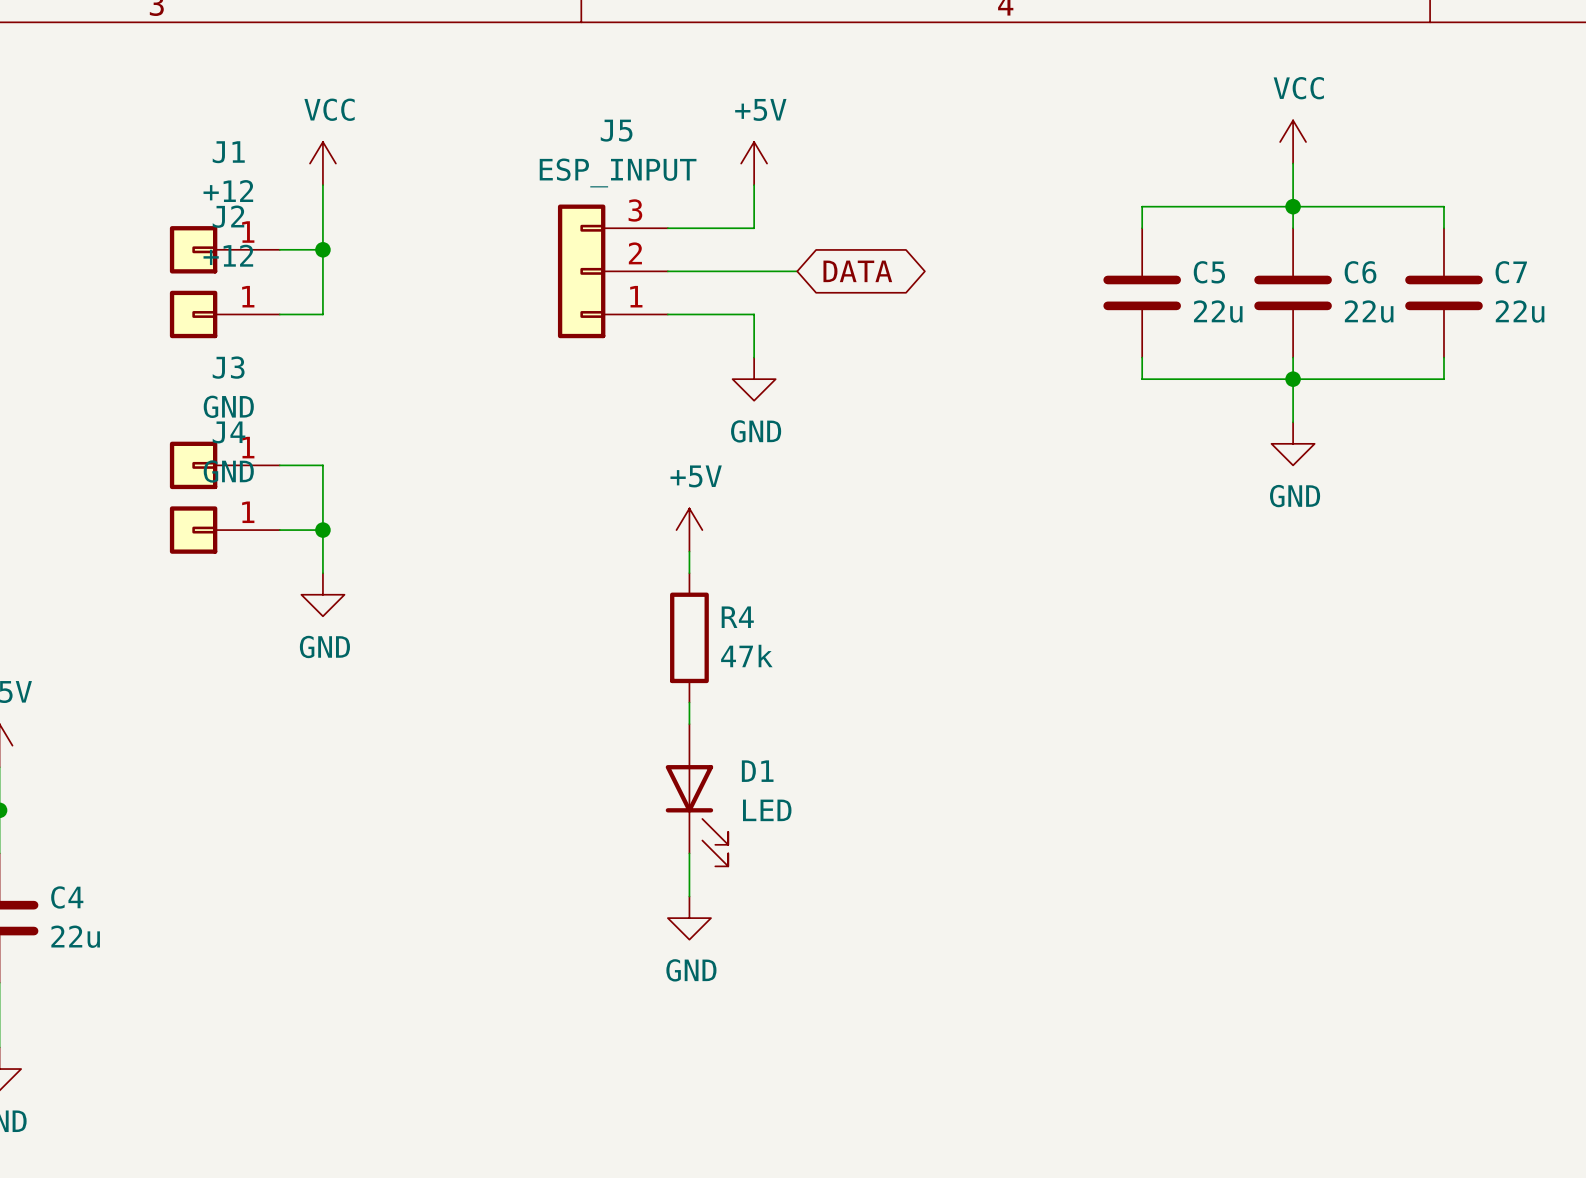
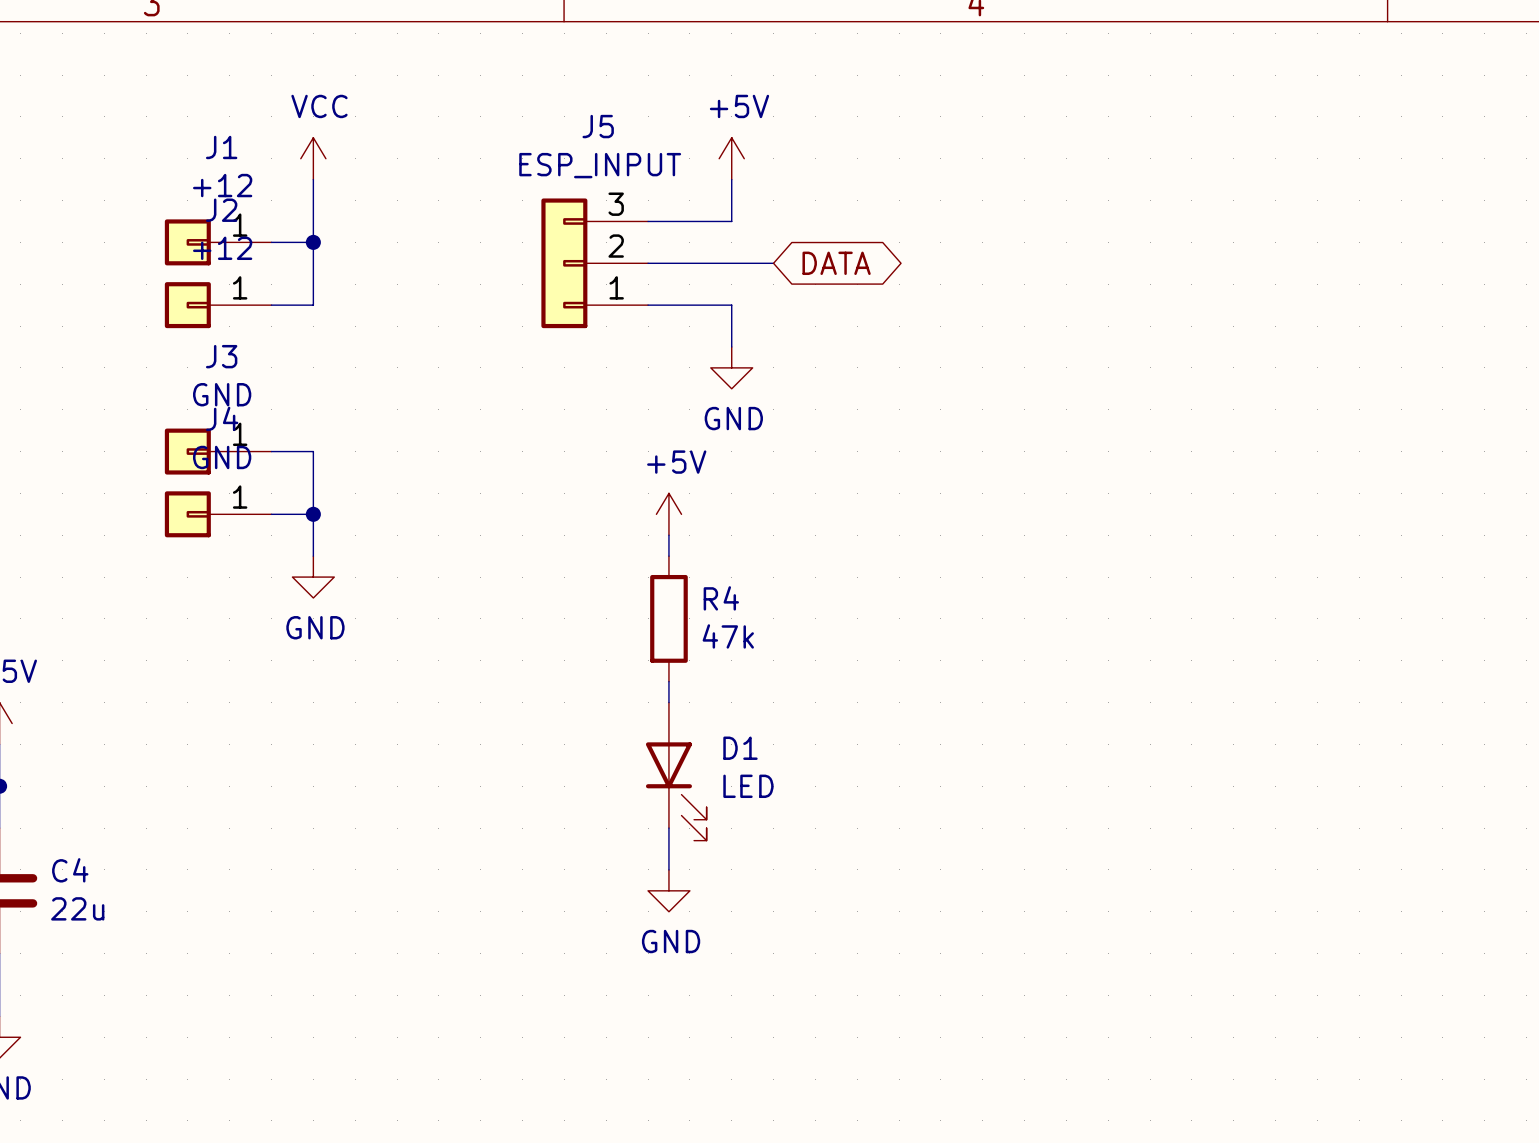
power symbol: VCC (1293, 142) -> none
wire: (1293, 163) (1293, 228) -> none
junction: (1293, 206) -> none
wire: (1142, 228) (1142, 206) (1443, 206) (1443, 228) -> none
C5: 22u (1142, 292) -> none
C6: 22u (1293, 292) -> none
C7: 22u (1443, 292) -> none
wire: (1142, 357) (1142, 379) (1443, 379) (1443, 357) -> none
wire: (1293, 357) (1293, 422) -> none
junction: (1293, 379) -> none
power symbol: GND (1293, 443) -> none

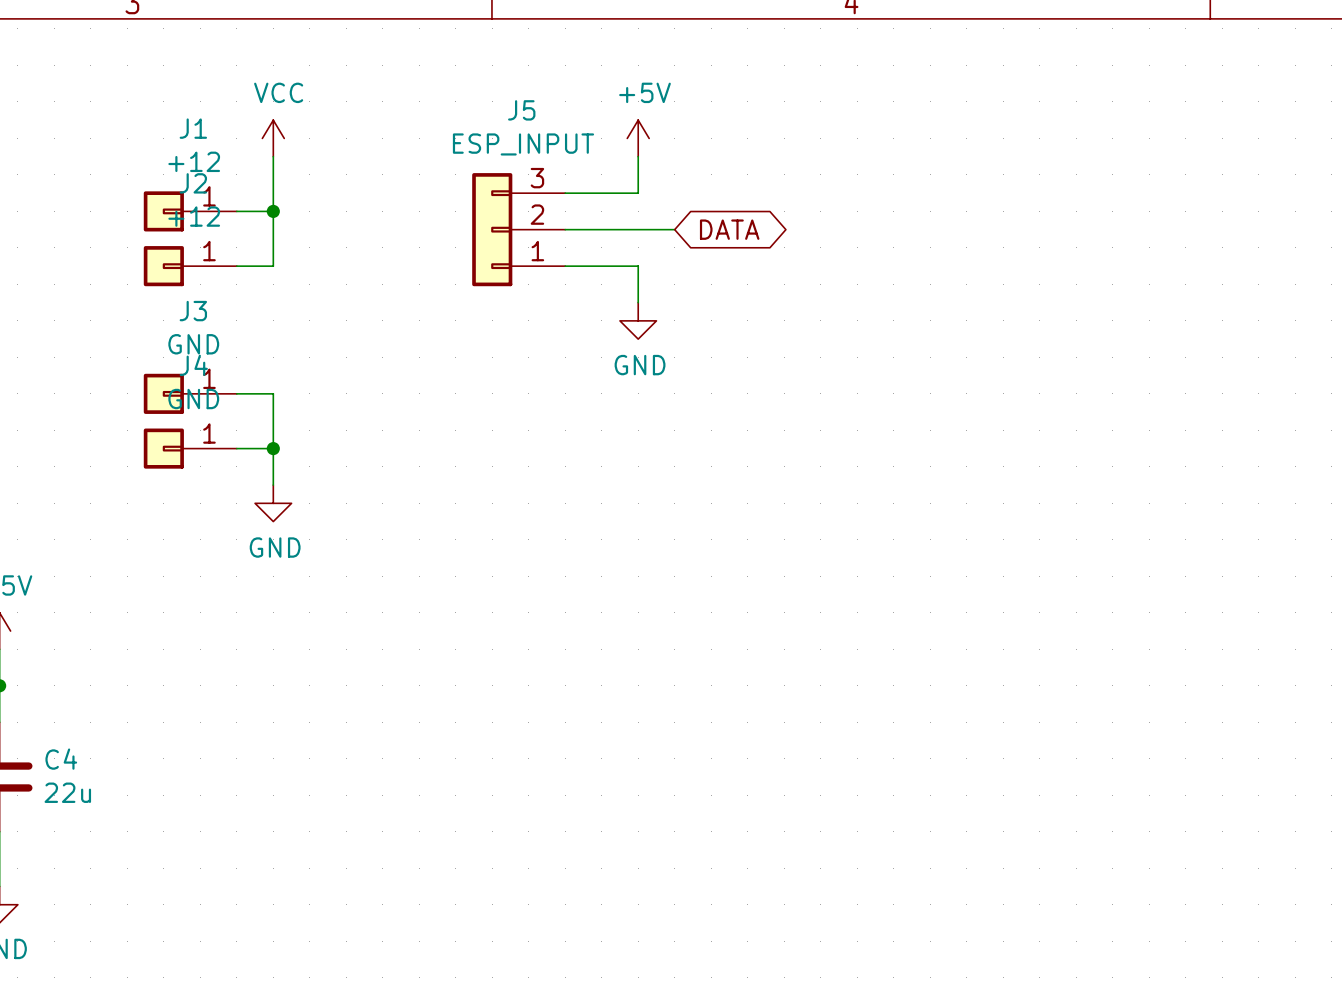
power symbol: +5V (668, 514) -> none
wire: (668, 535) (668, 556) -> none
R4: 47k (668, 618) -> none
wire: (668, 681) (668, 702) -> none
D1: LED (676, 771) -> none
wire: (668, 828) (668, 869) -> none
power symbol: GND (668, 890) -> none

